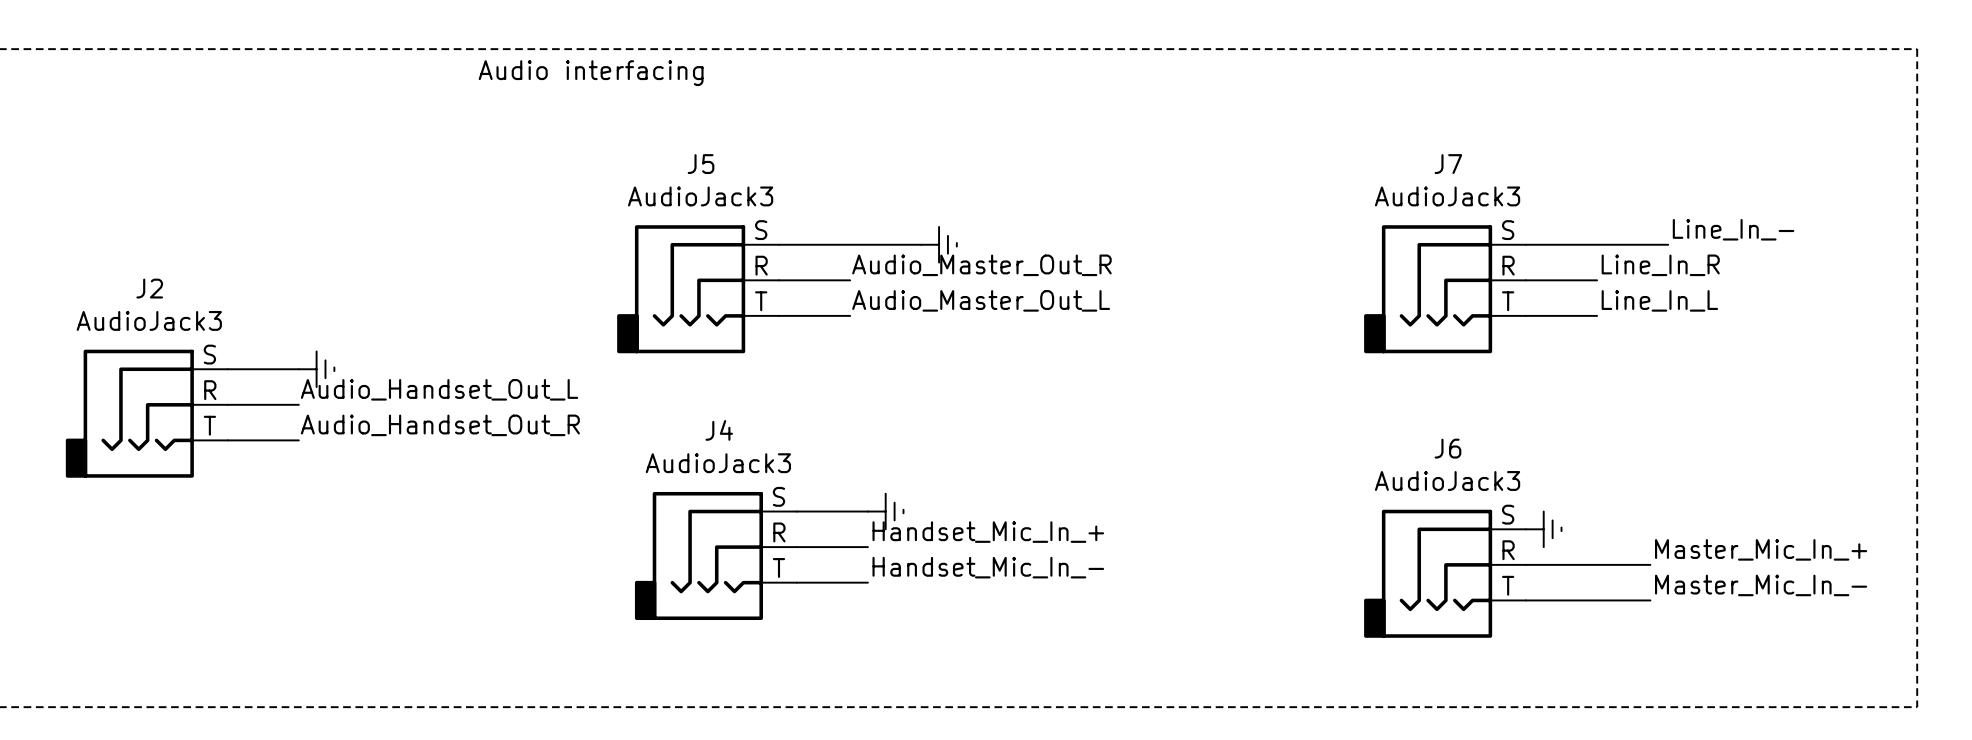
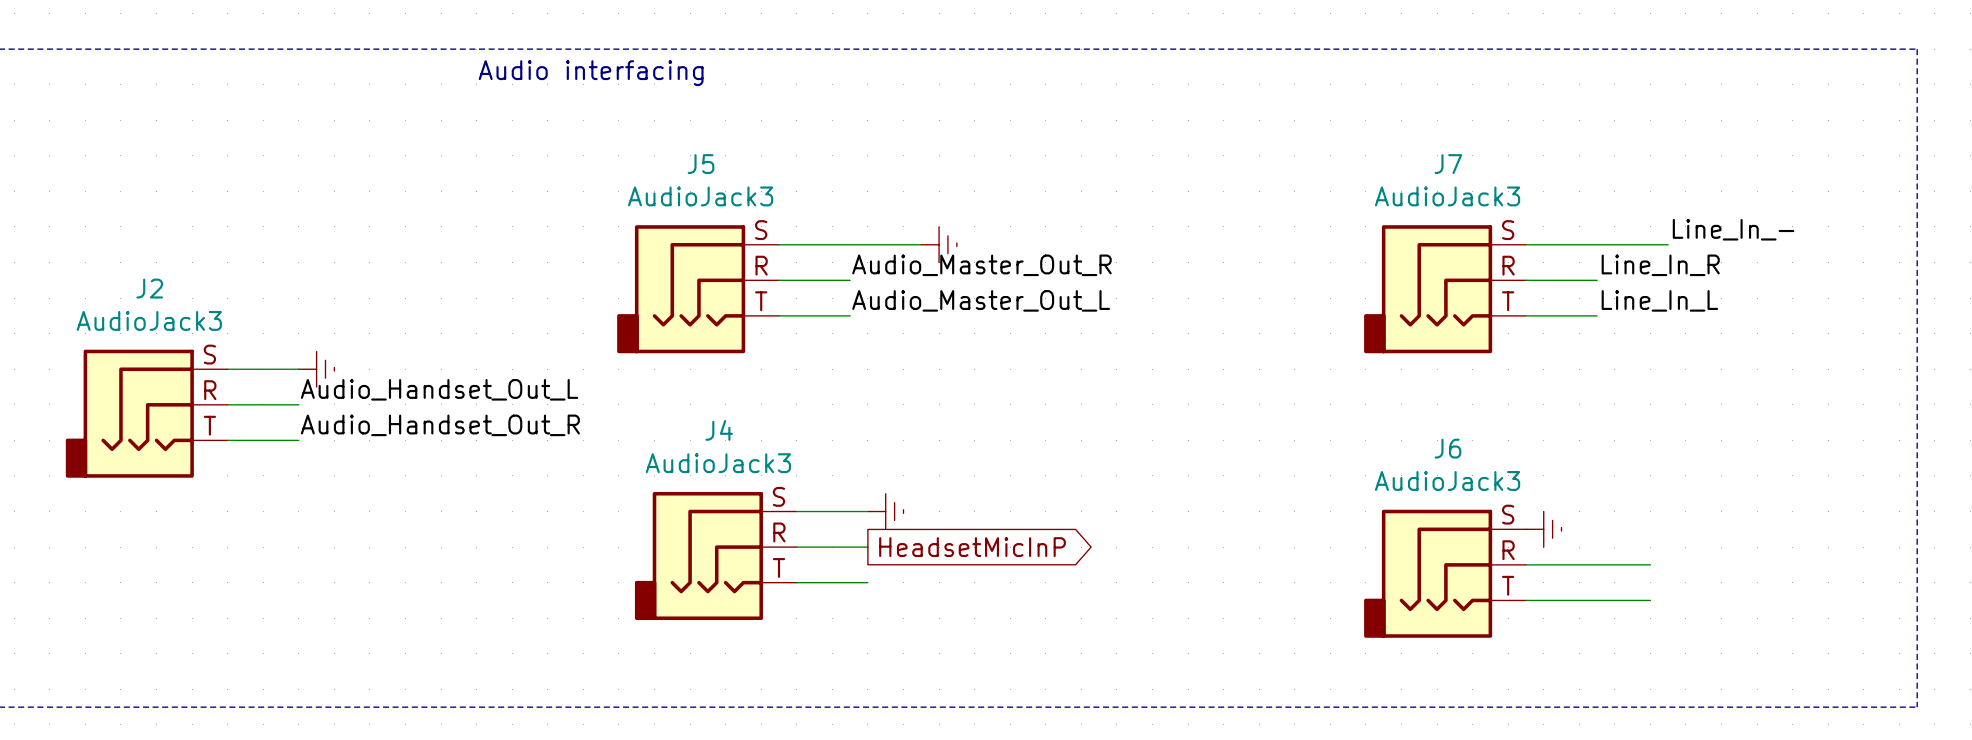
label: Handset_Mic_In_+ (988, 532) -> none
global label: none -> HeadsetMicInP (972, 547)
label: Master_Mic_In_+ (1761, 549) -> none
label: Handset_Mic_In_- (988, 567) -> none
label: Master_Mic_In_- (1761, 585) -> none

